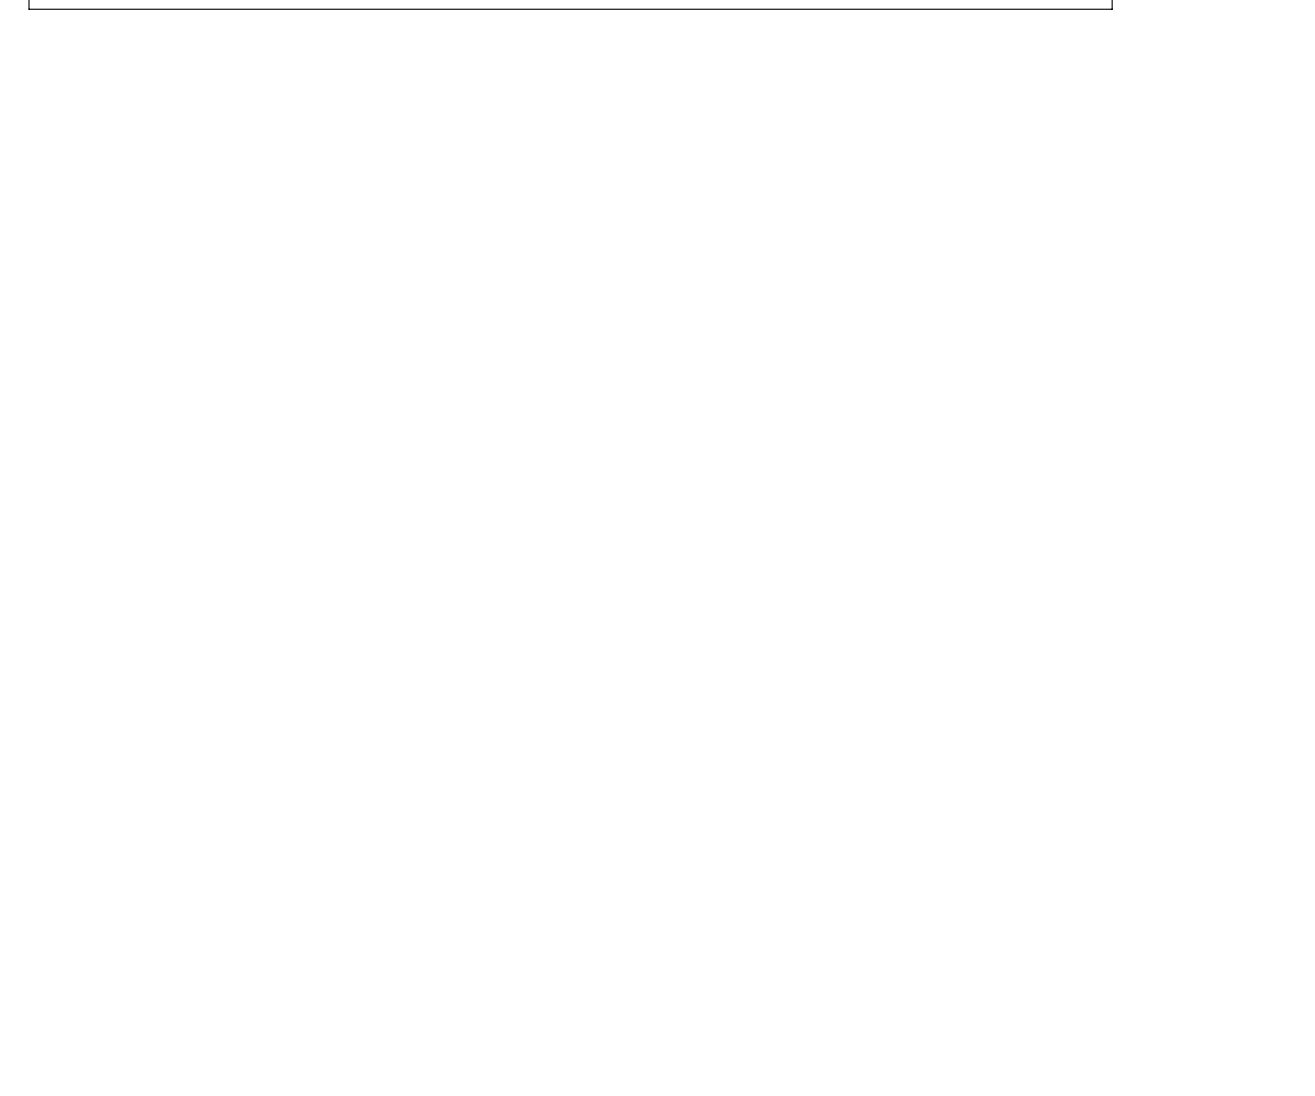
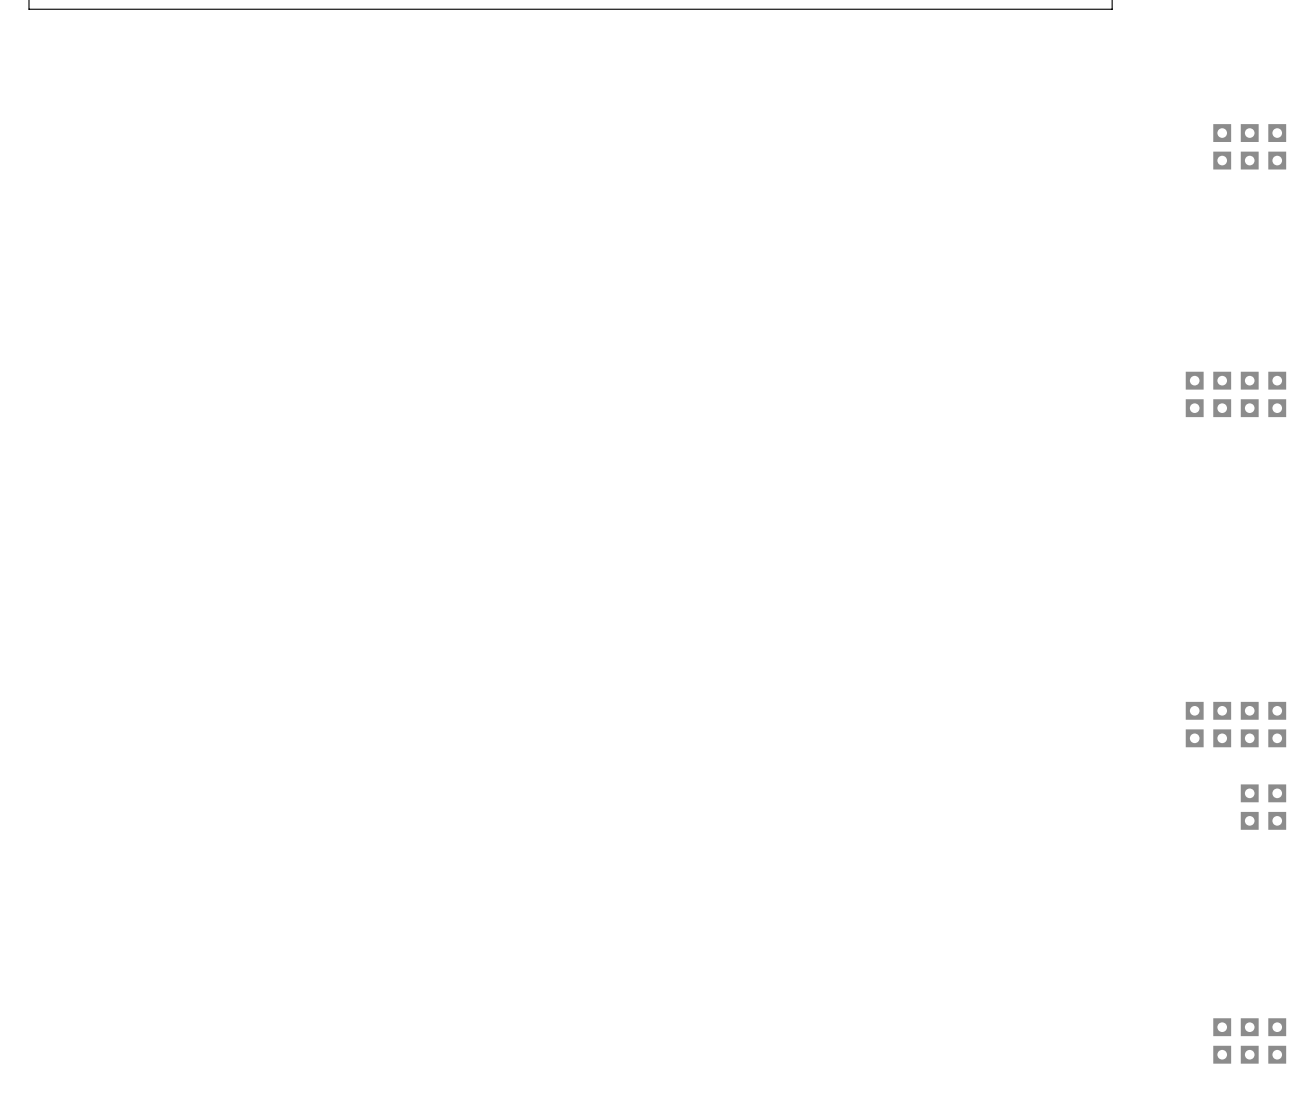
part: none -> (1249, 146)
part: none -> (1235, 394)
part: none -> (1235, 724)
part: none -> (1263, 807)
part: none -> (1249, 1040)

